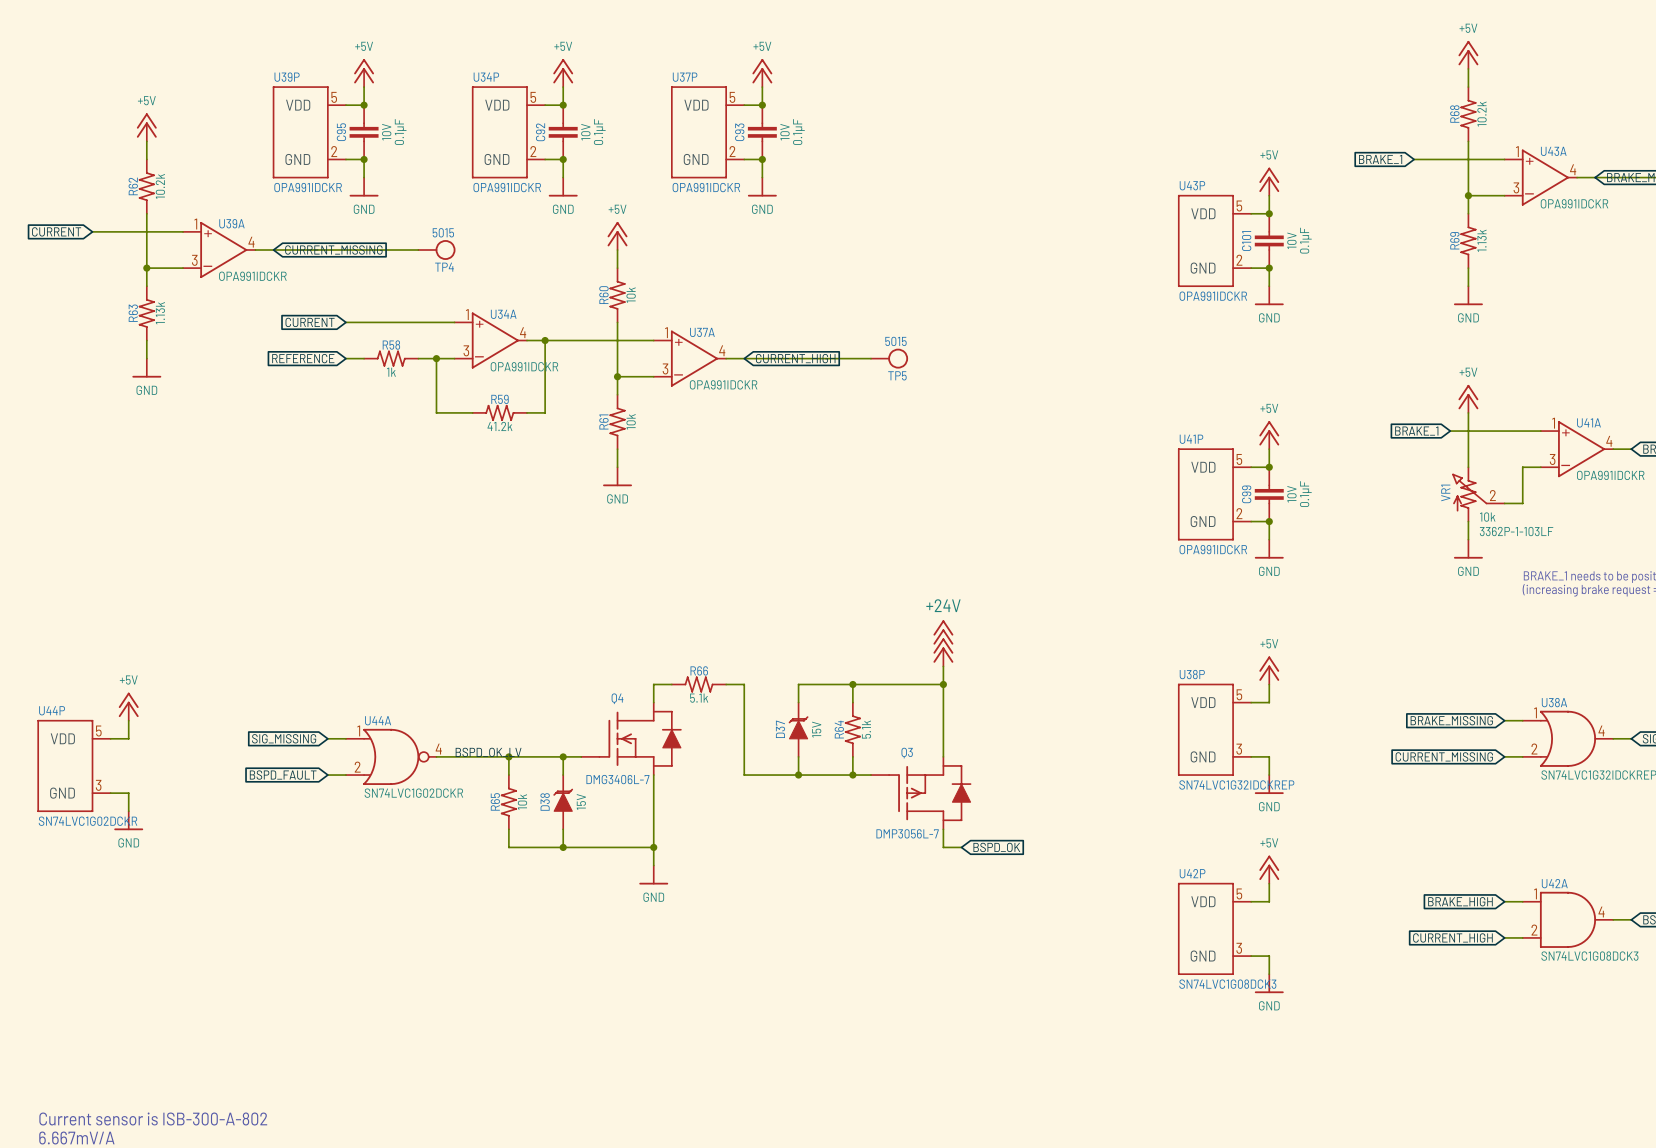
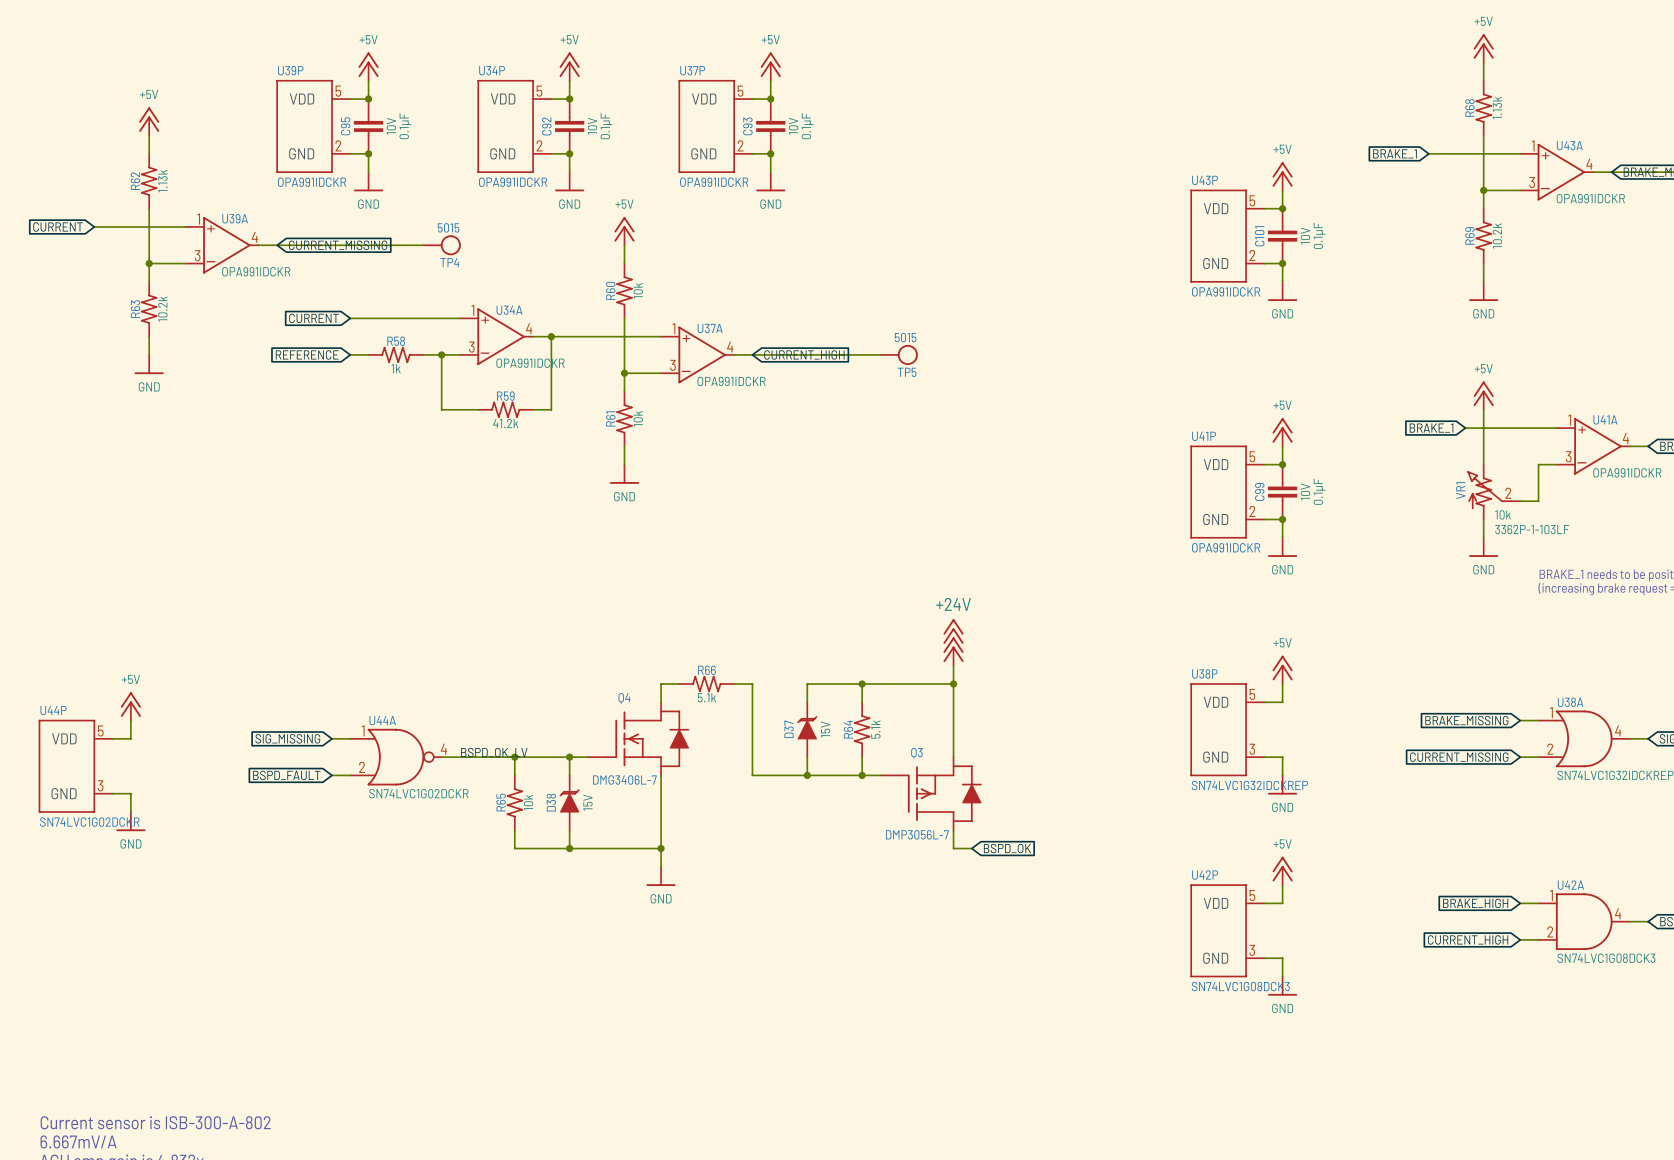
R68 text: 10.2k (1482, 114) -> 1.13k (1497, 108)
R62 text: 10.2k (160, 186) -> 1.13k (162, 181)
R69 text: 1.13k (1482, 240) -> 10.2k (1497, 235)
R63 text: 1.13k (160, 313) -> 10.2k (162, 309)

